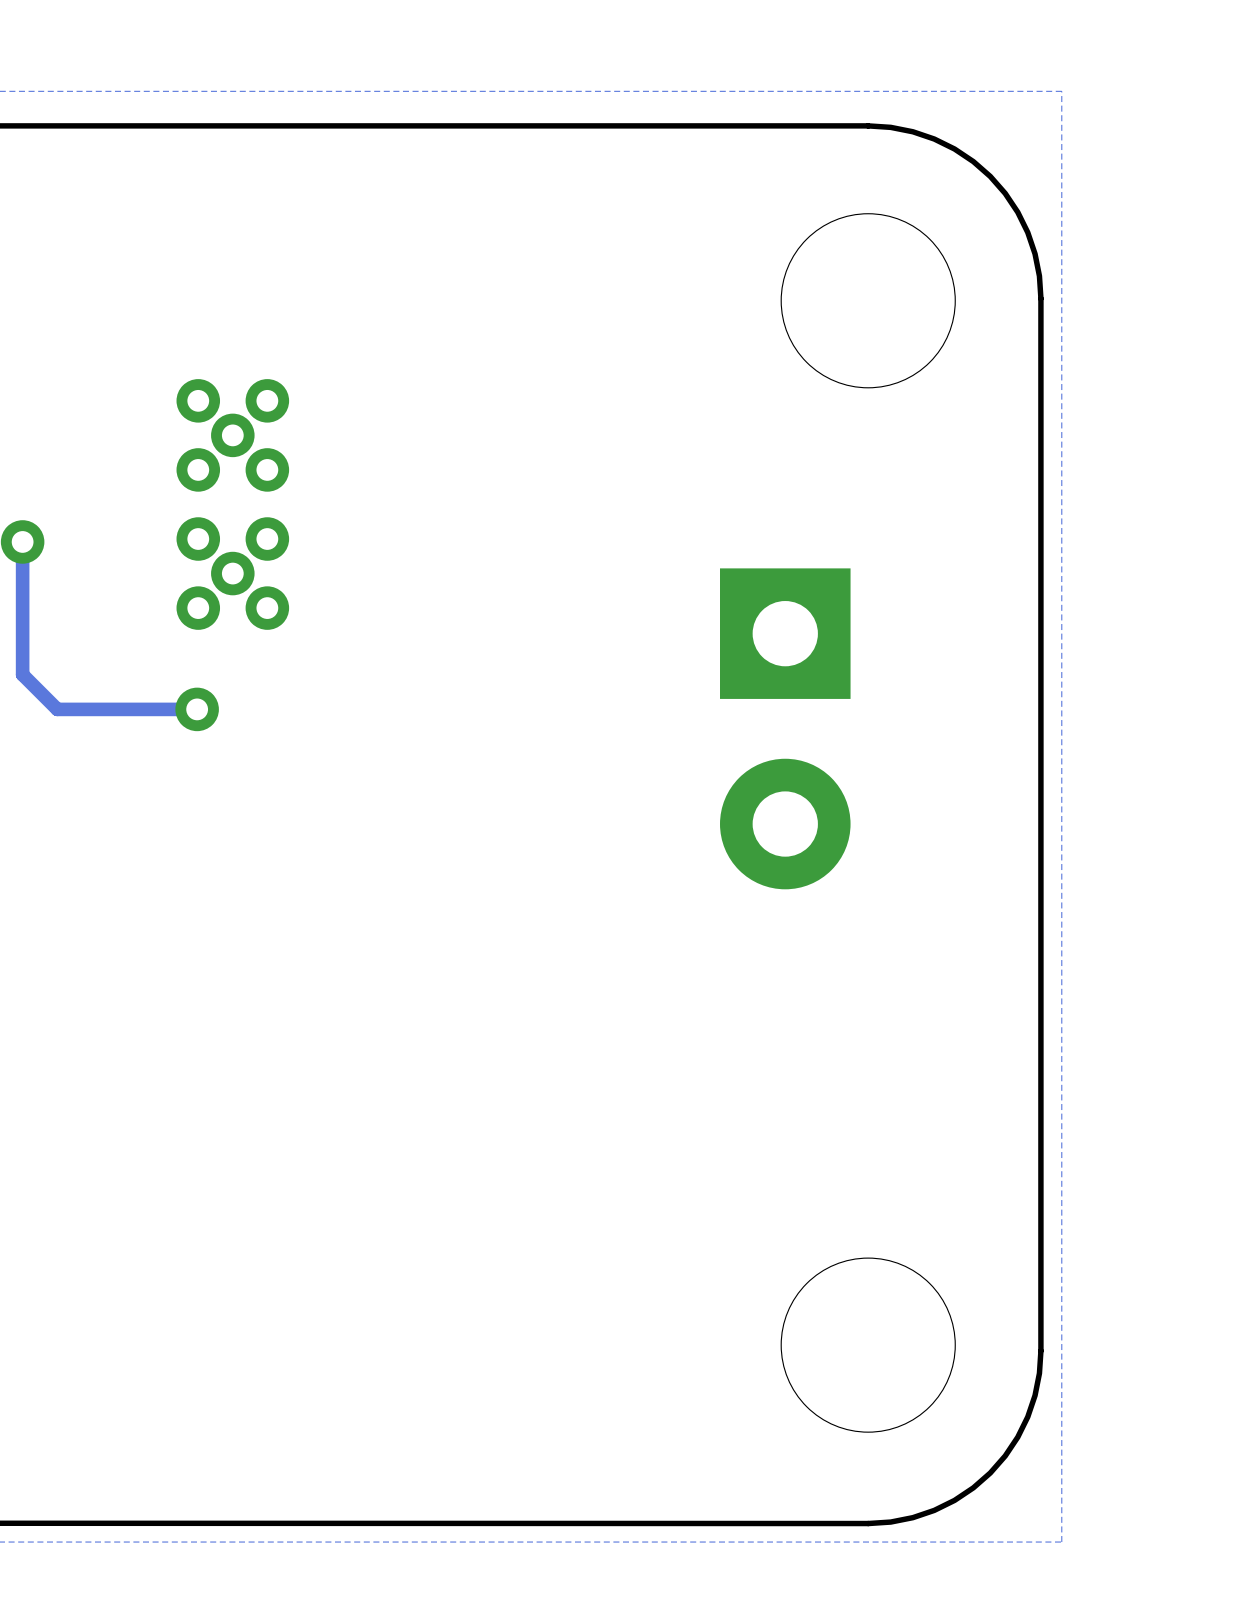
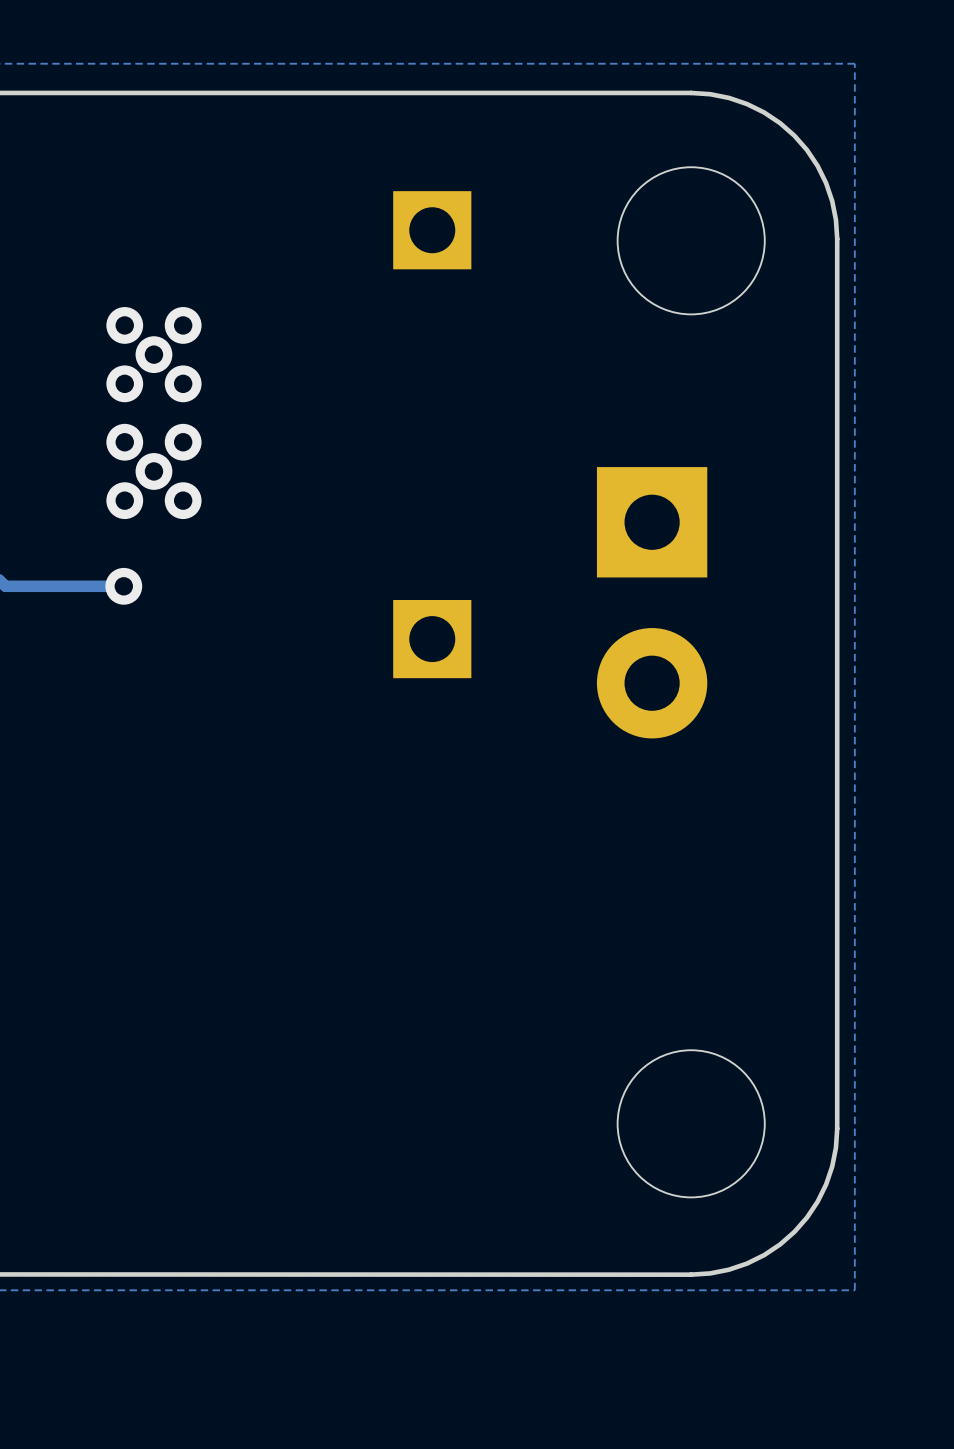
part: none -> (432, 230)
part position: (785, 728) -> (652, 602)
part: none -> (432, 639)

